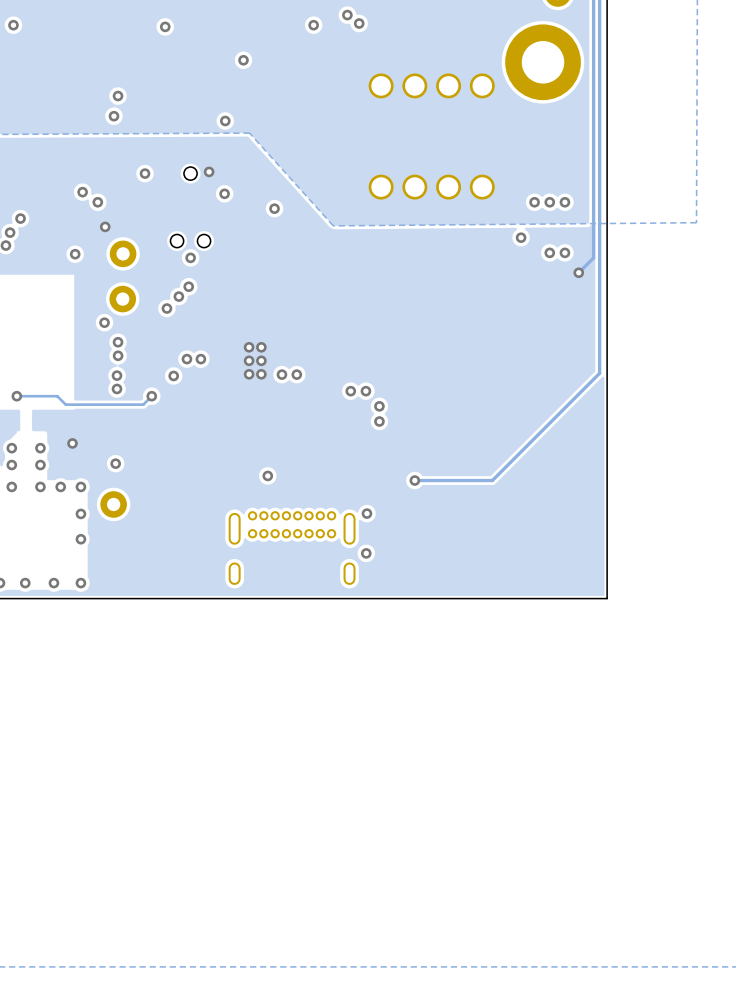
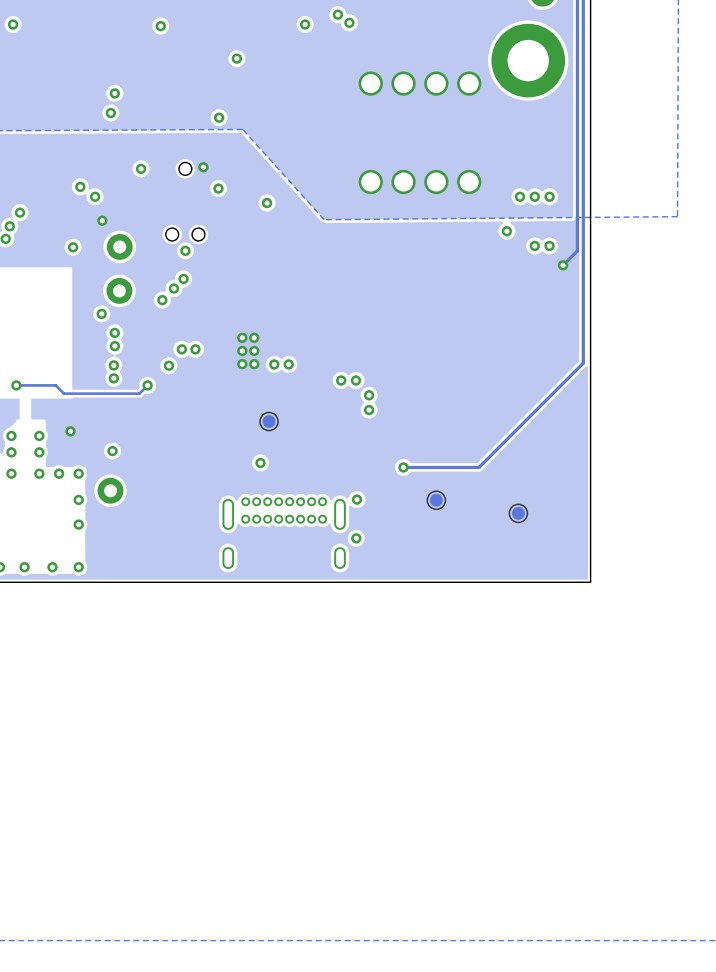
part: none -> (269, 421)
part: none -> (436, 500)
part: none -> (518, 513)

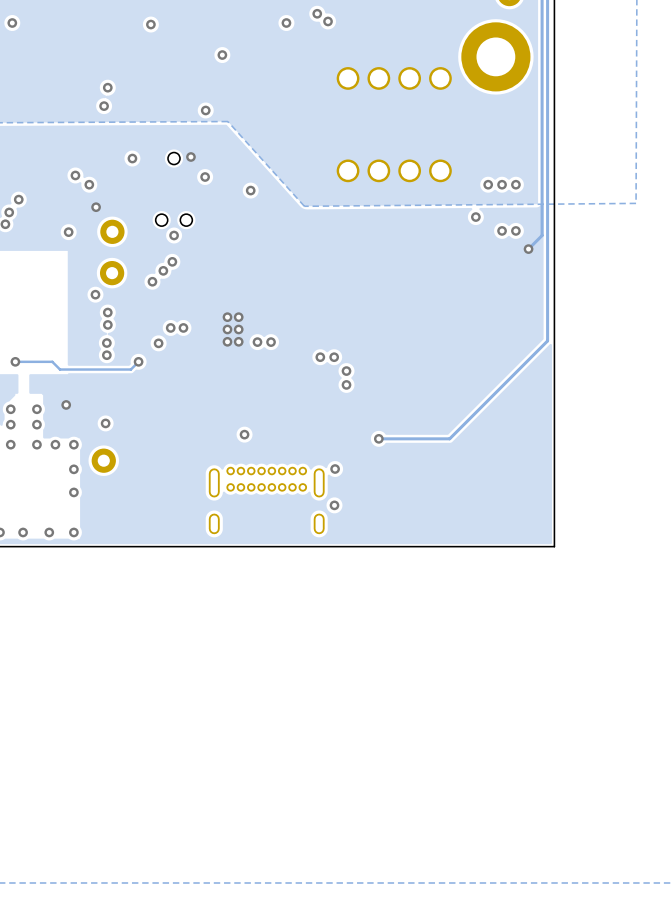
part: (269, 421) -> none
part: (436, 500) -> none
part: (518, 513) -> none

